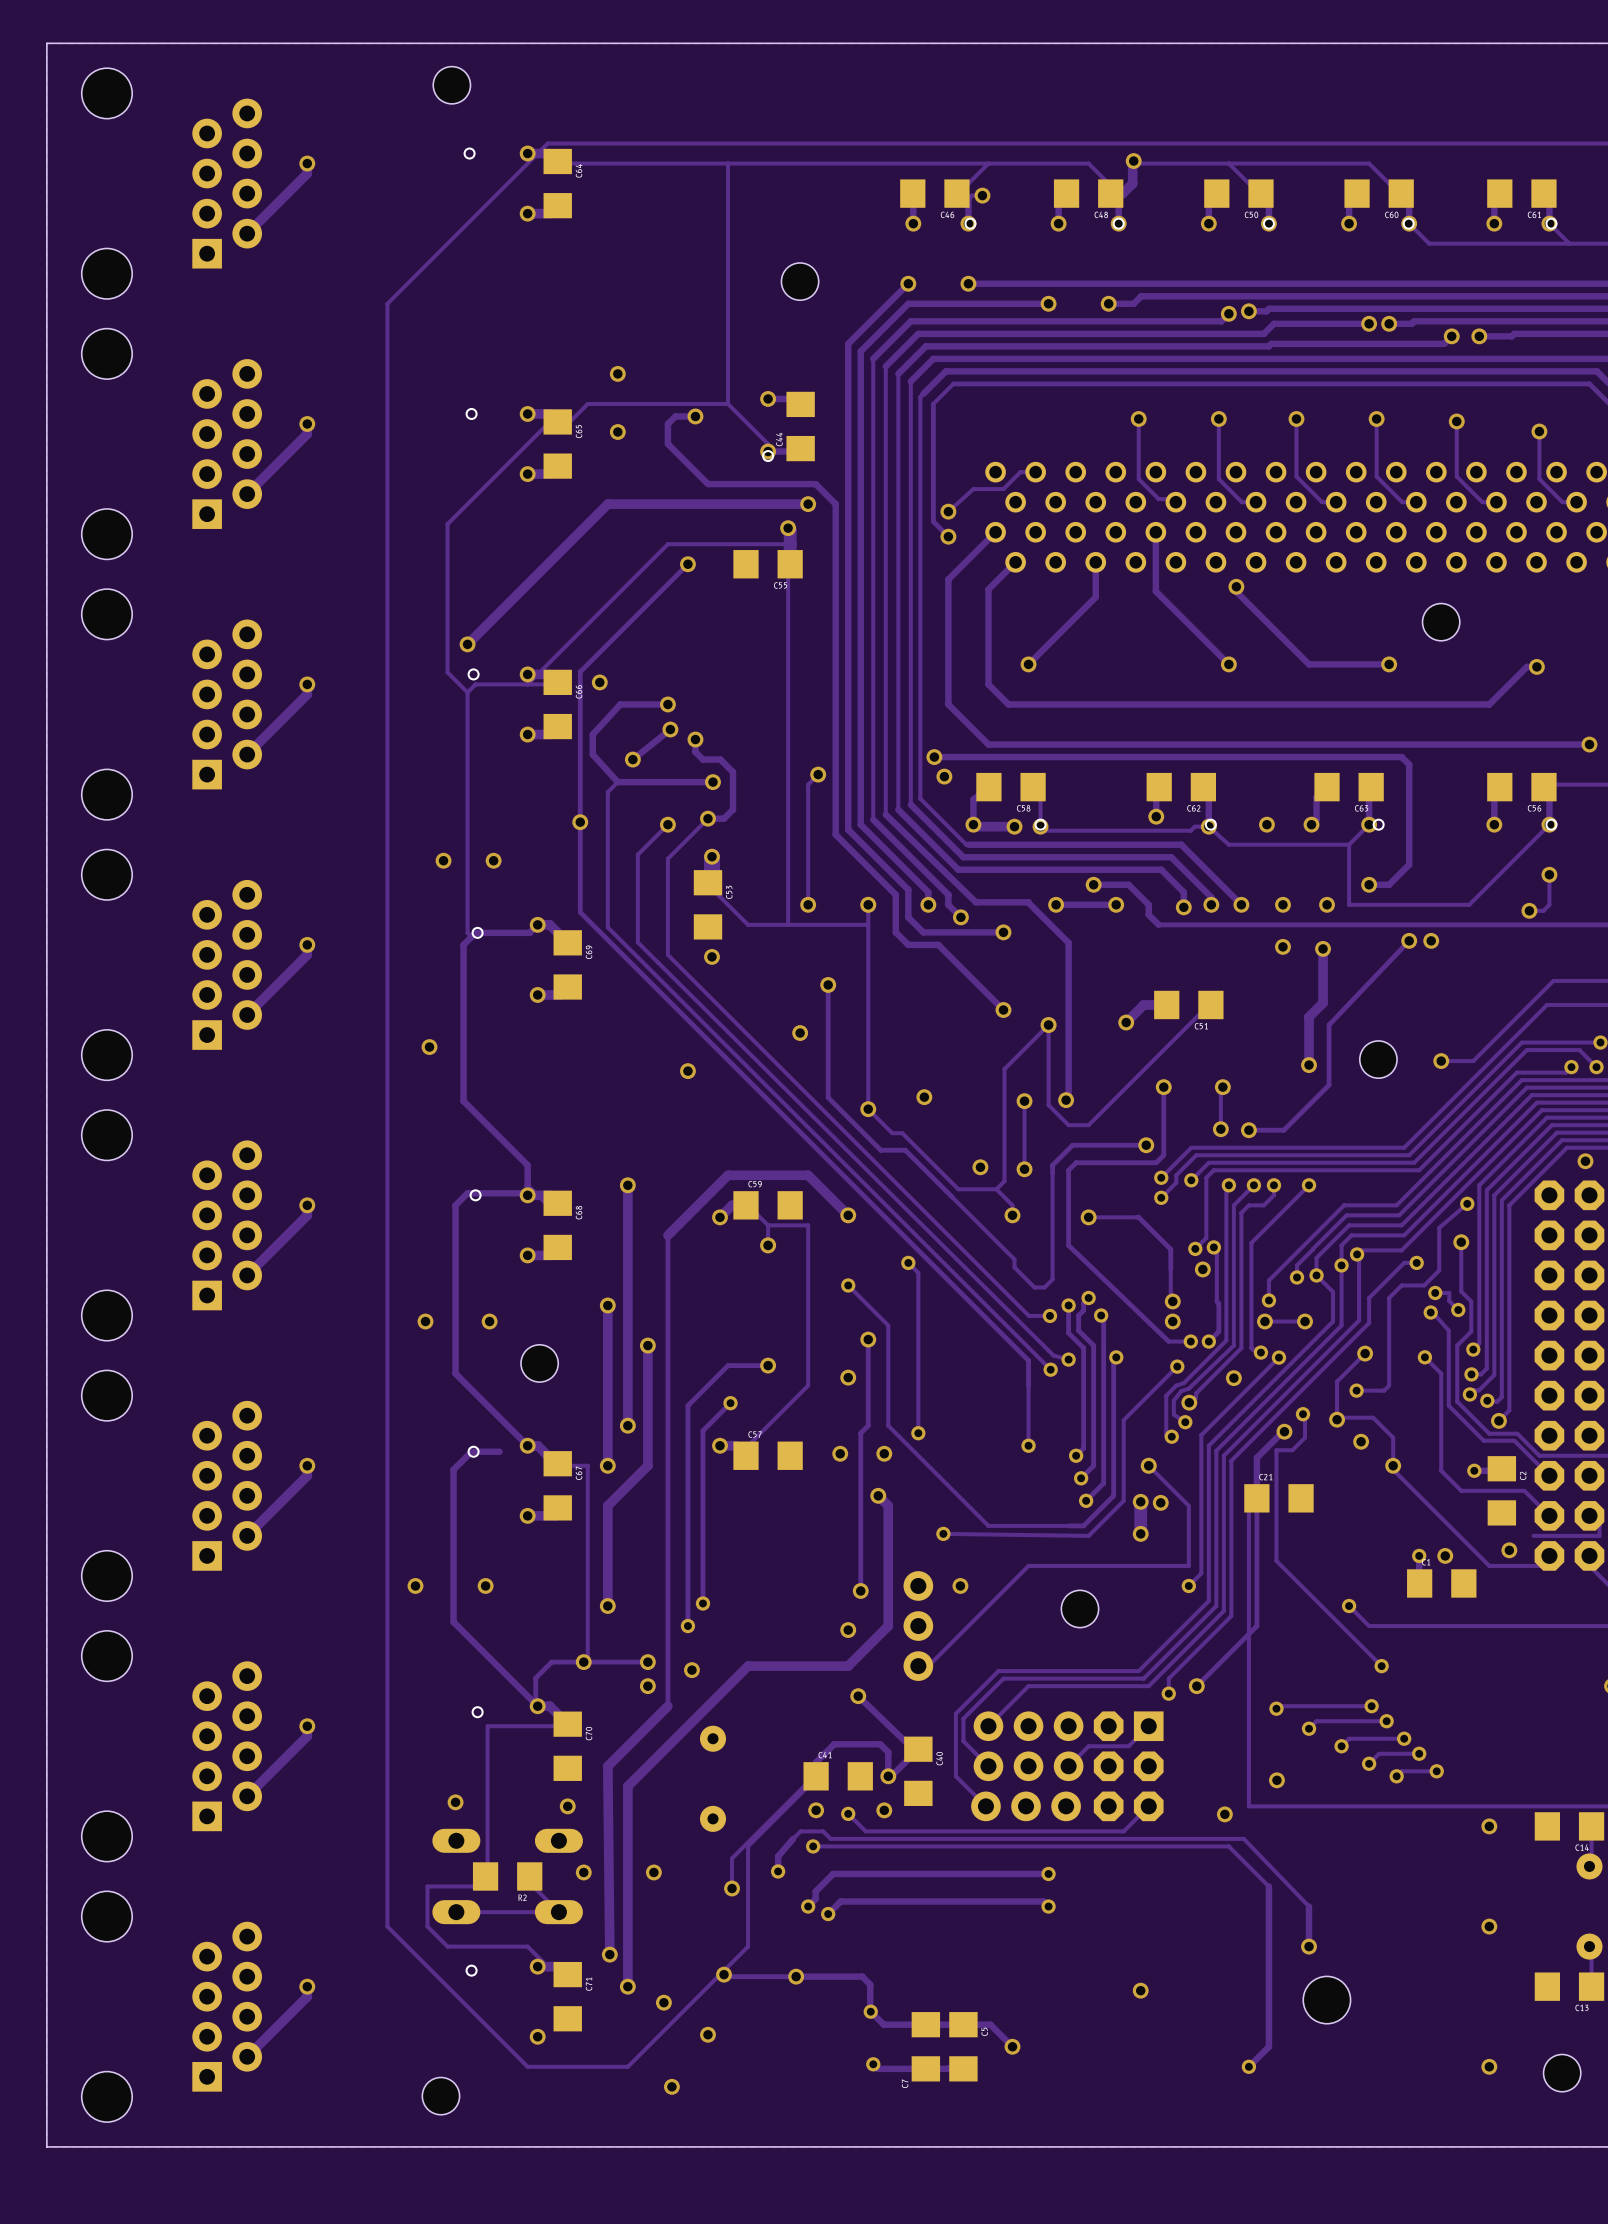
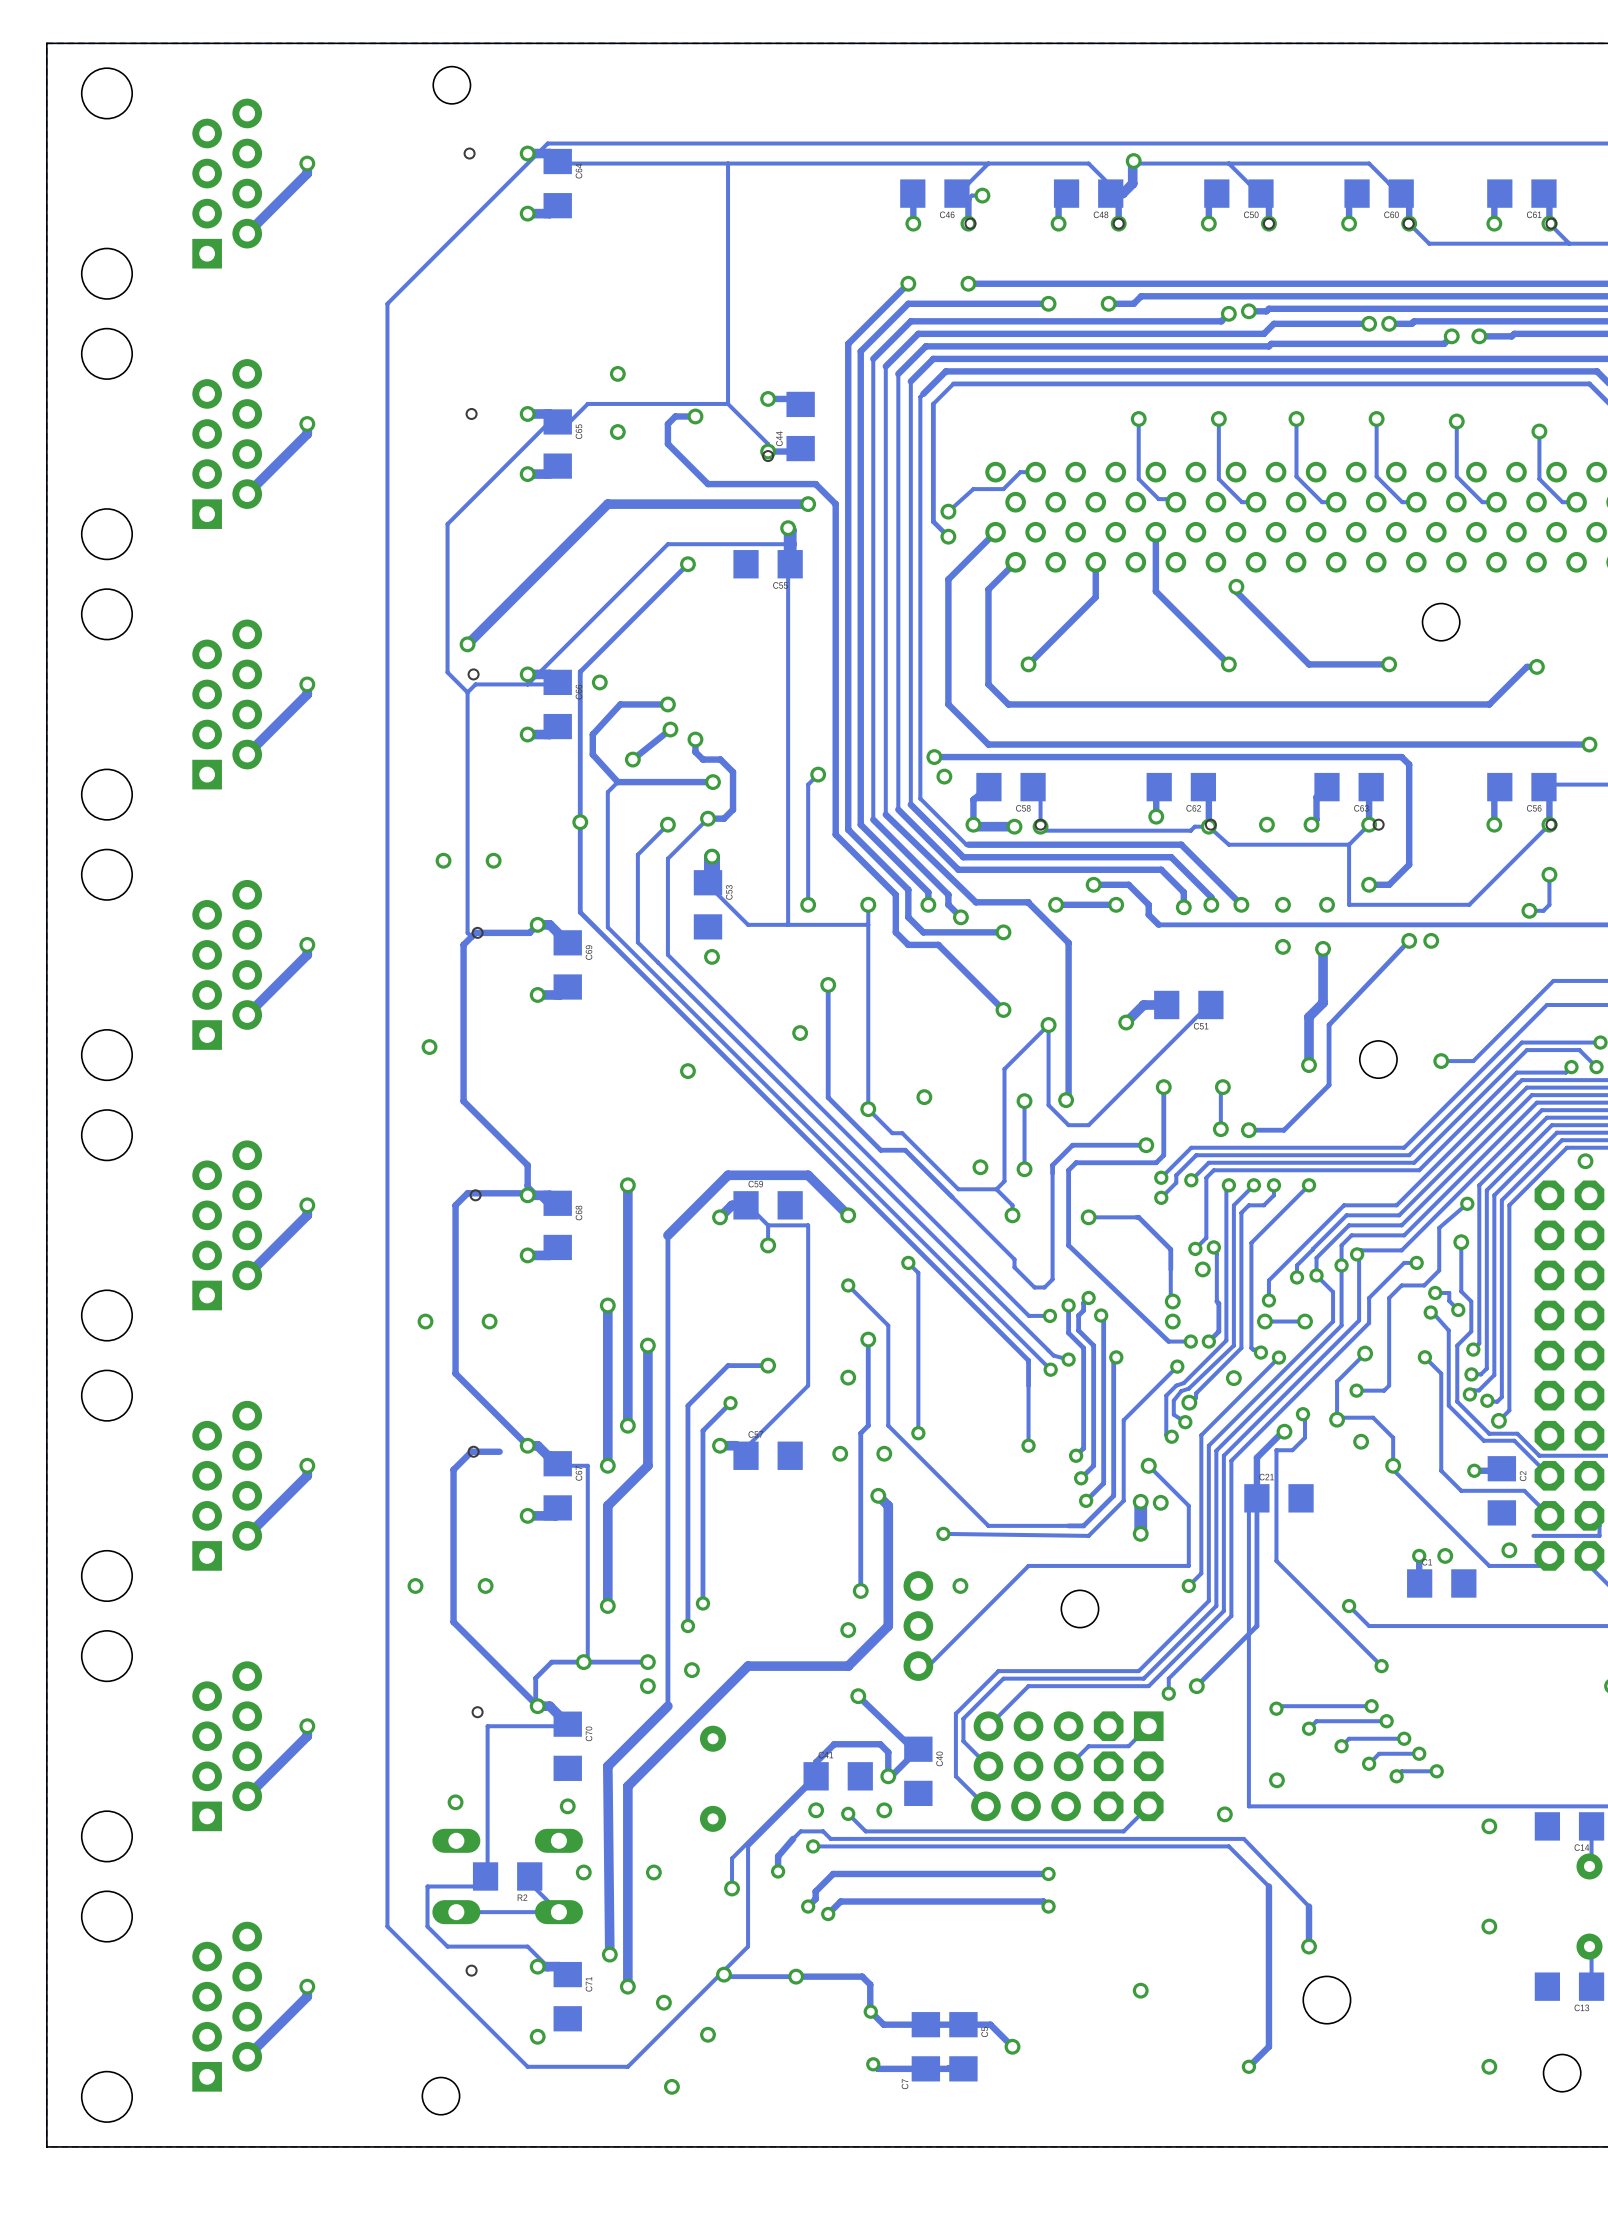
hole: (800, 281) -> none
hole: (539, 1363) -> none

